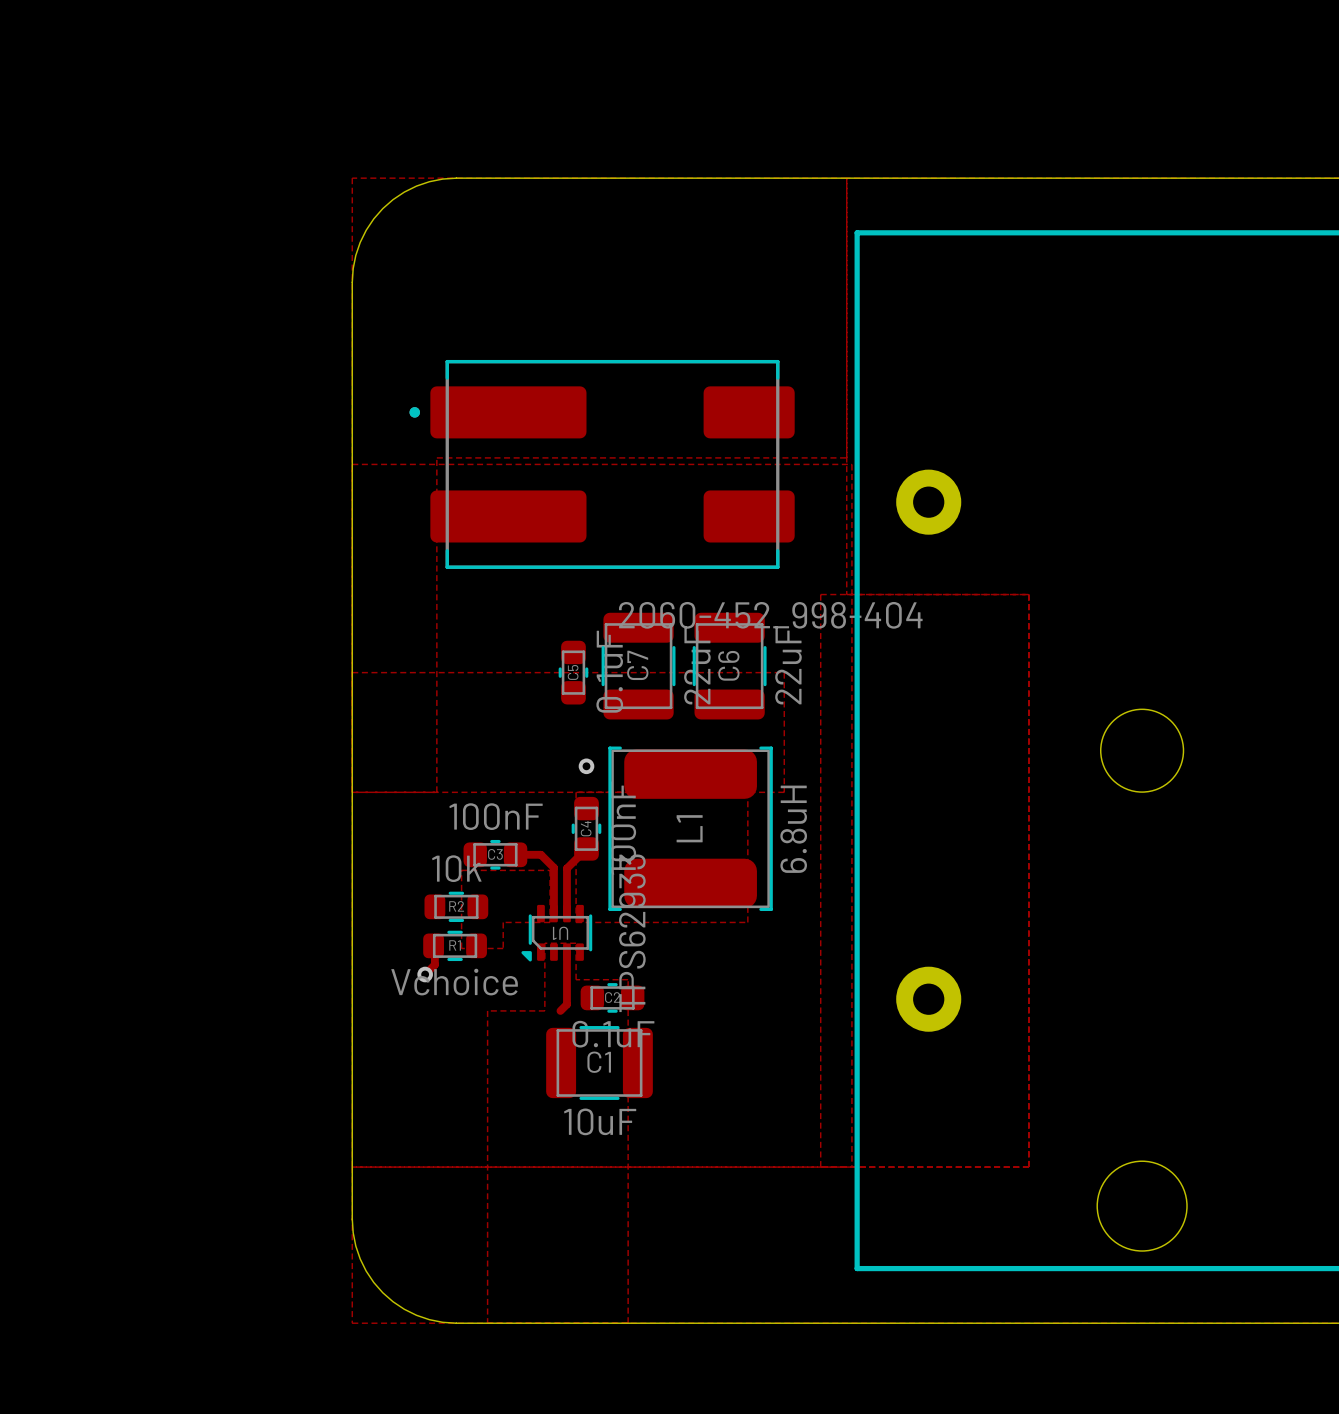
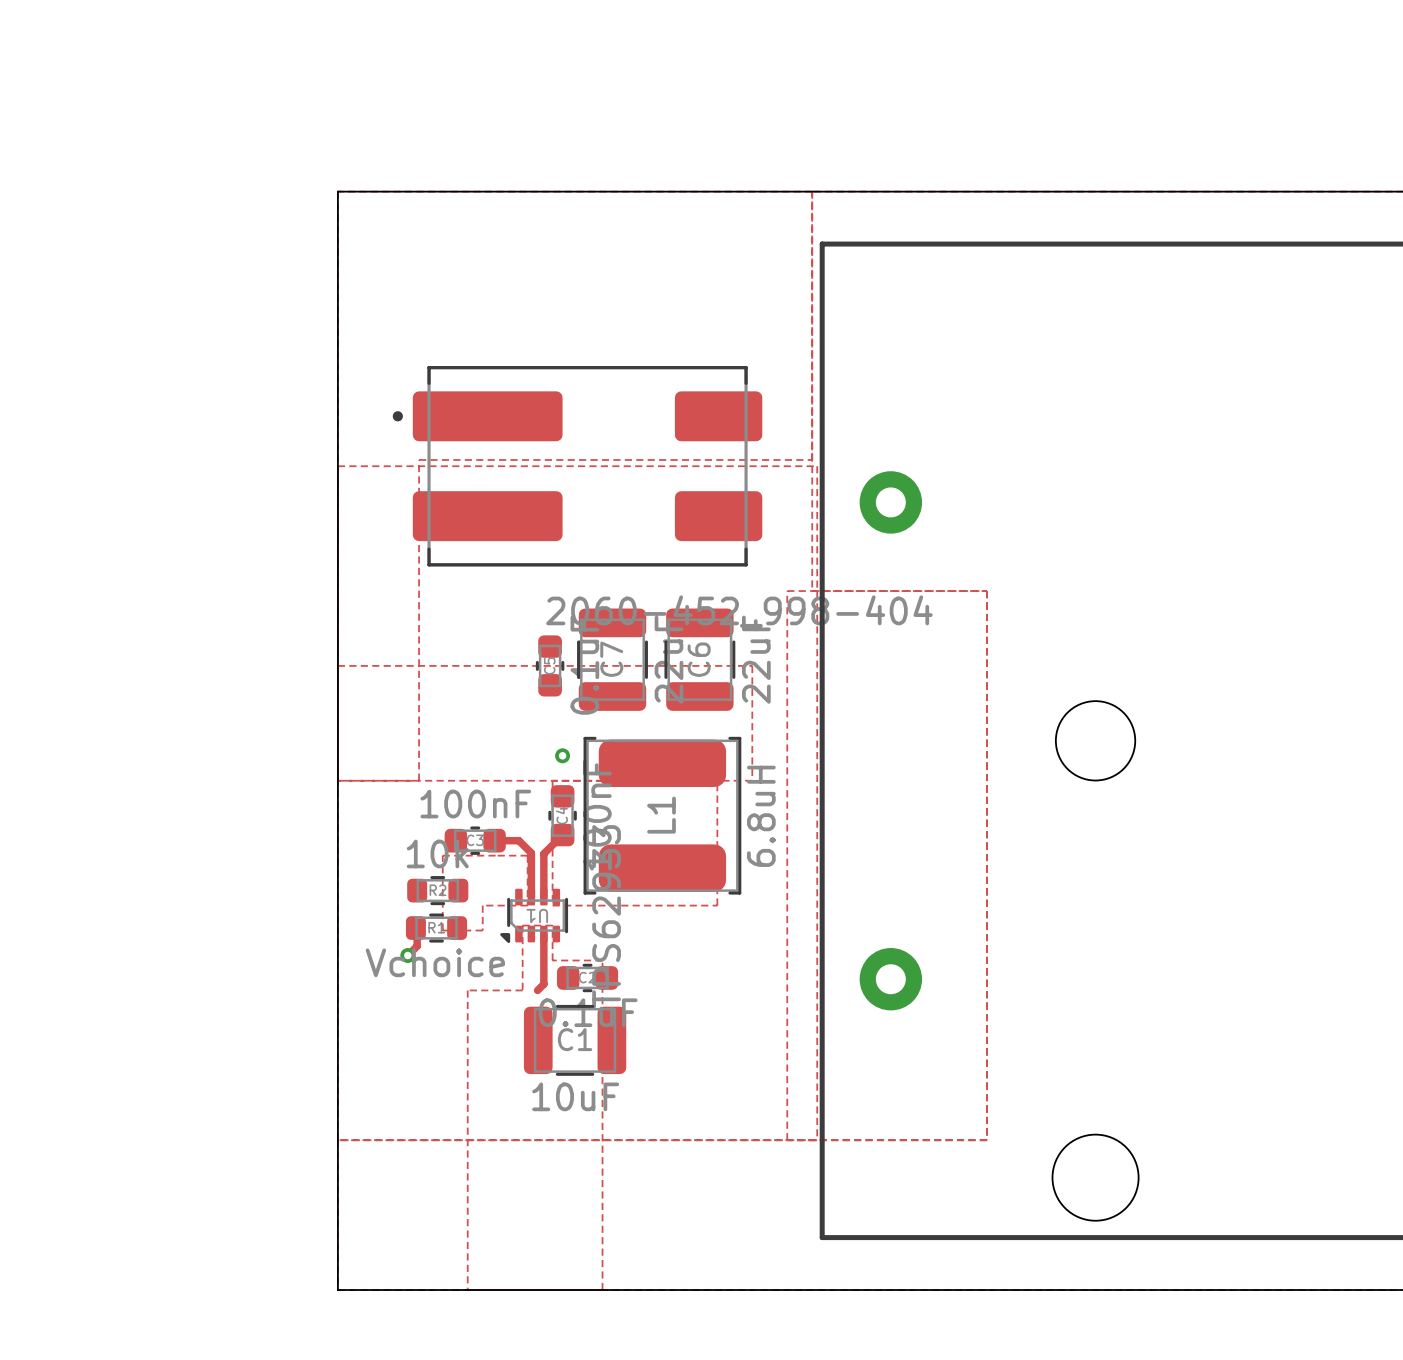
board edge: (456, 178) (442, 179) (416, 186) (404, 192) (382, 208) (366, 230) (360, 242) (353, 268) (352, 282) -> (437, 191) (337, 191) (337, 291)
board edge: (352, 1219) (353, 1232) (360, 1258) (366, 1271) (382, 1292) (404, 1309) (416, 1315) (442, 1322) (456, 1323) -> (337, 1190) (337, 1290) (437, 1290)

